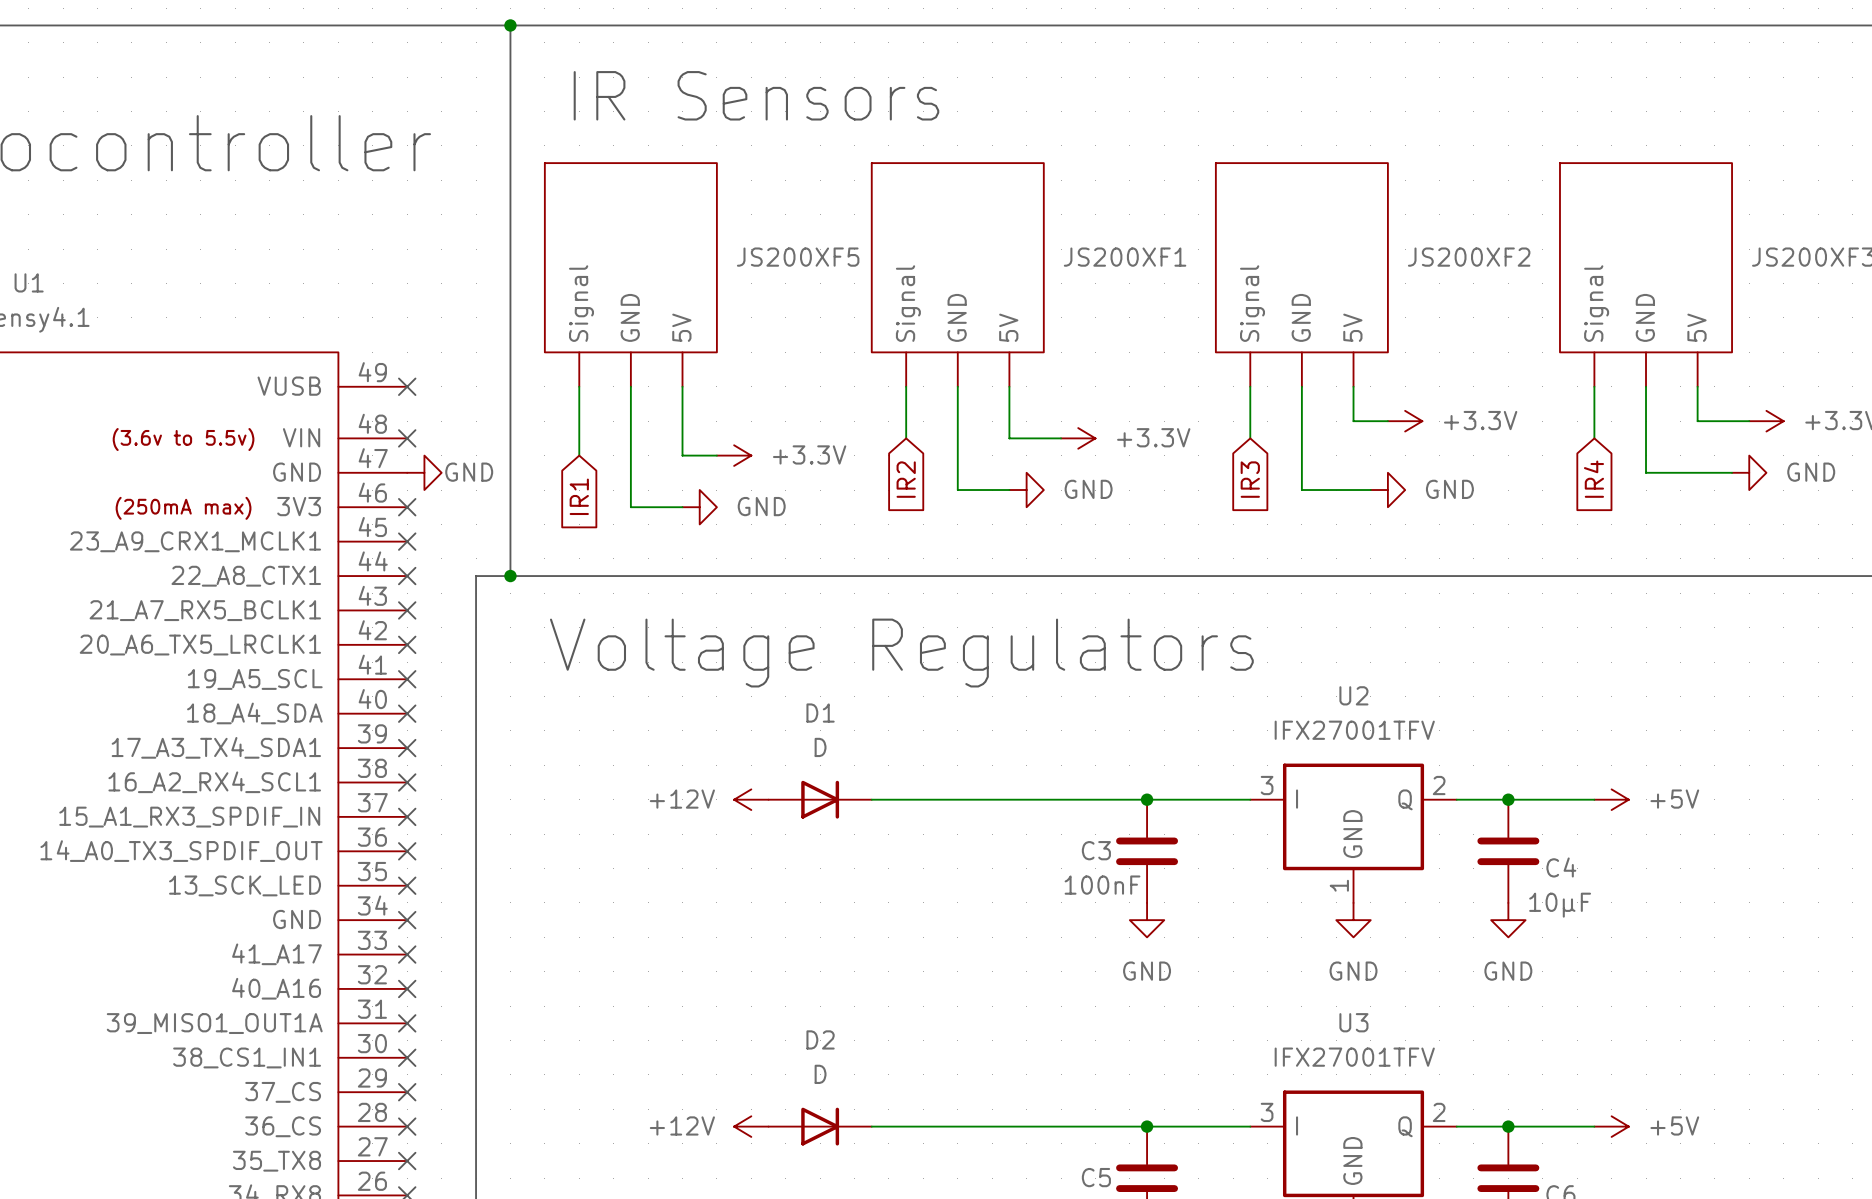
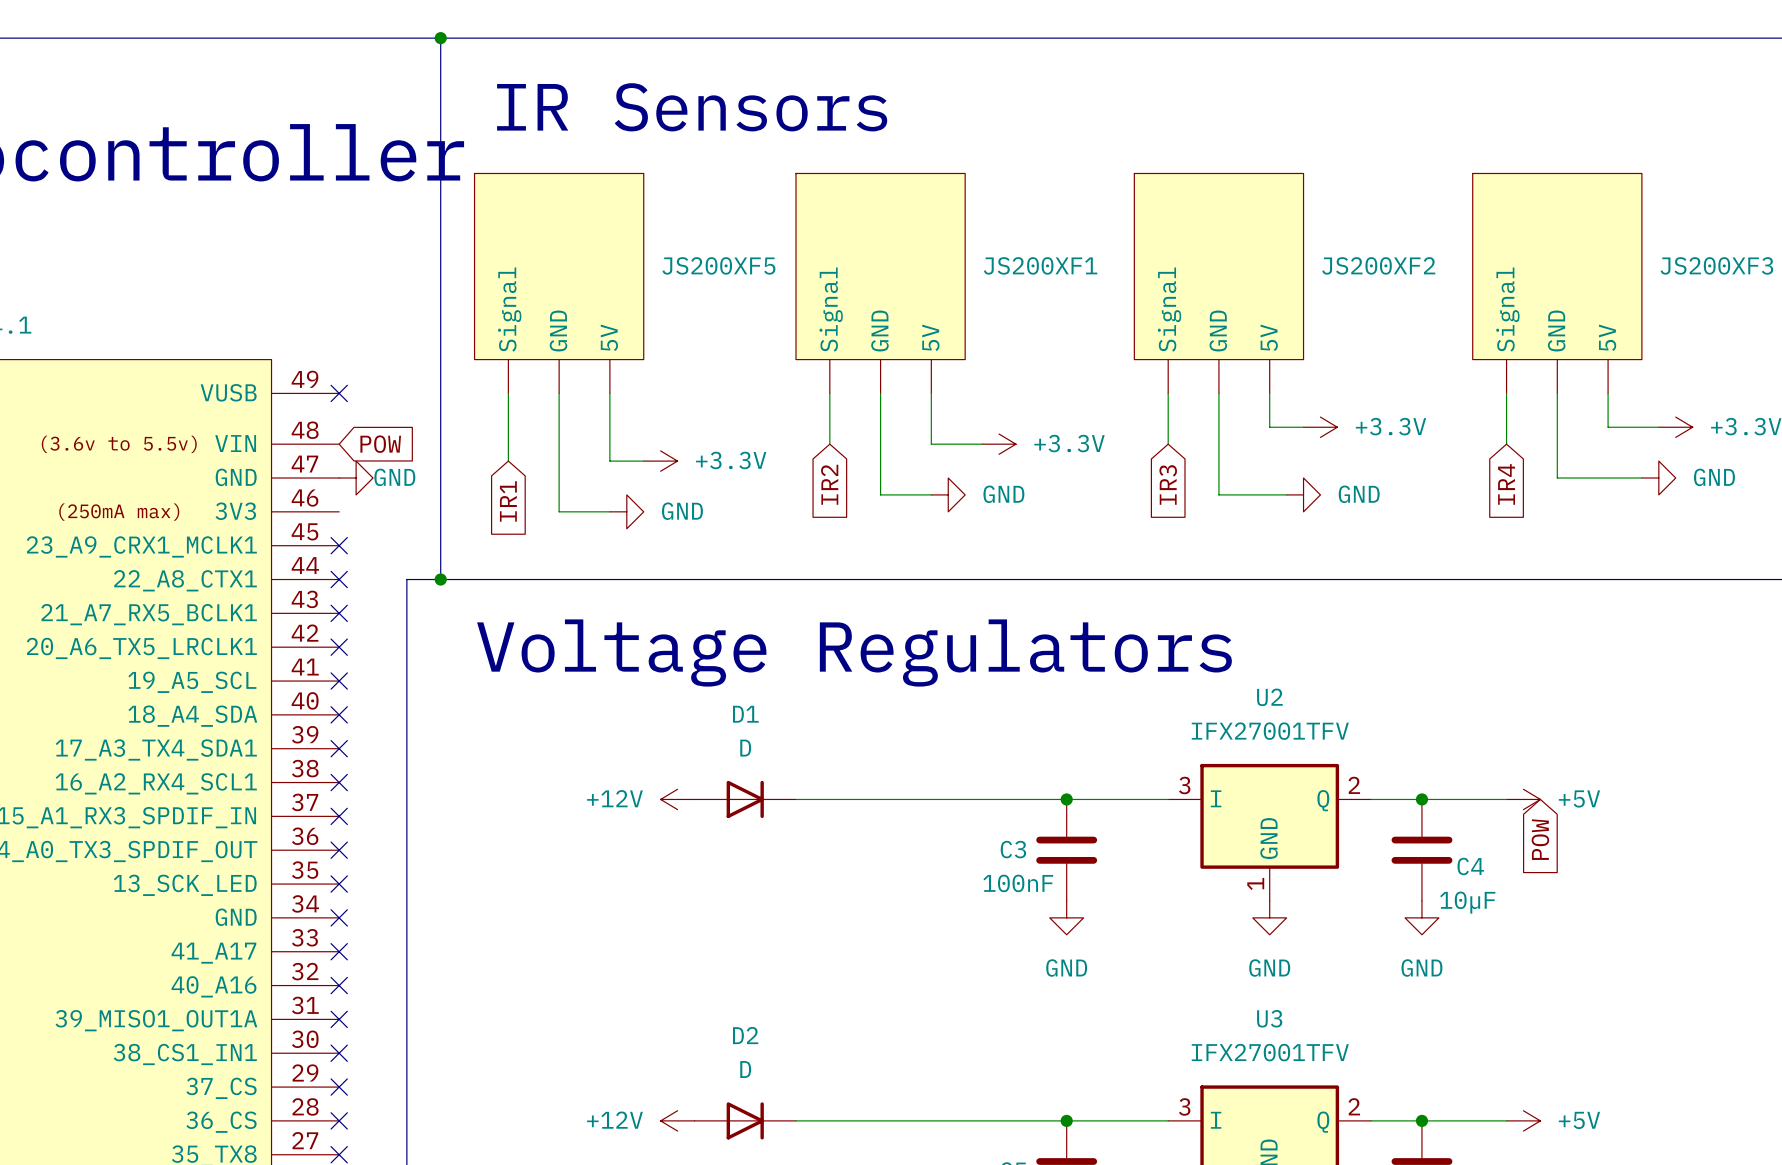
no-connect mark: (407, 438) -> none
global label: none -> POW (380, 444)
no-connect mark: (407, 507) -> none
global label: none -> POW (1540, 839)

